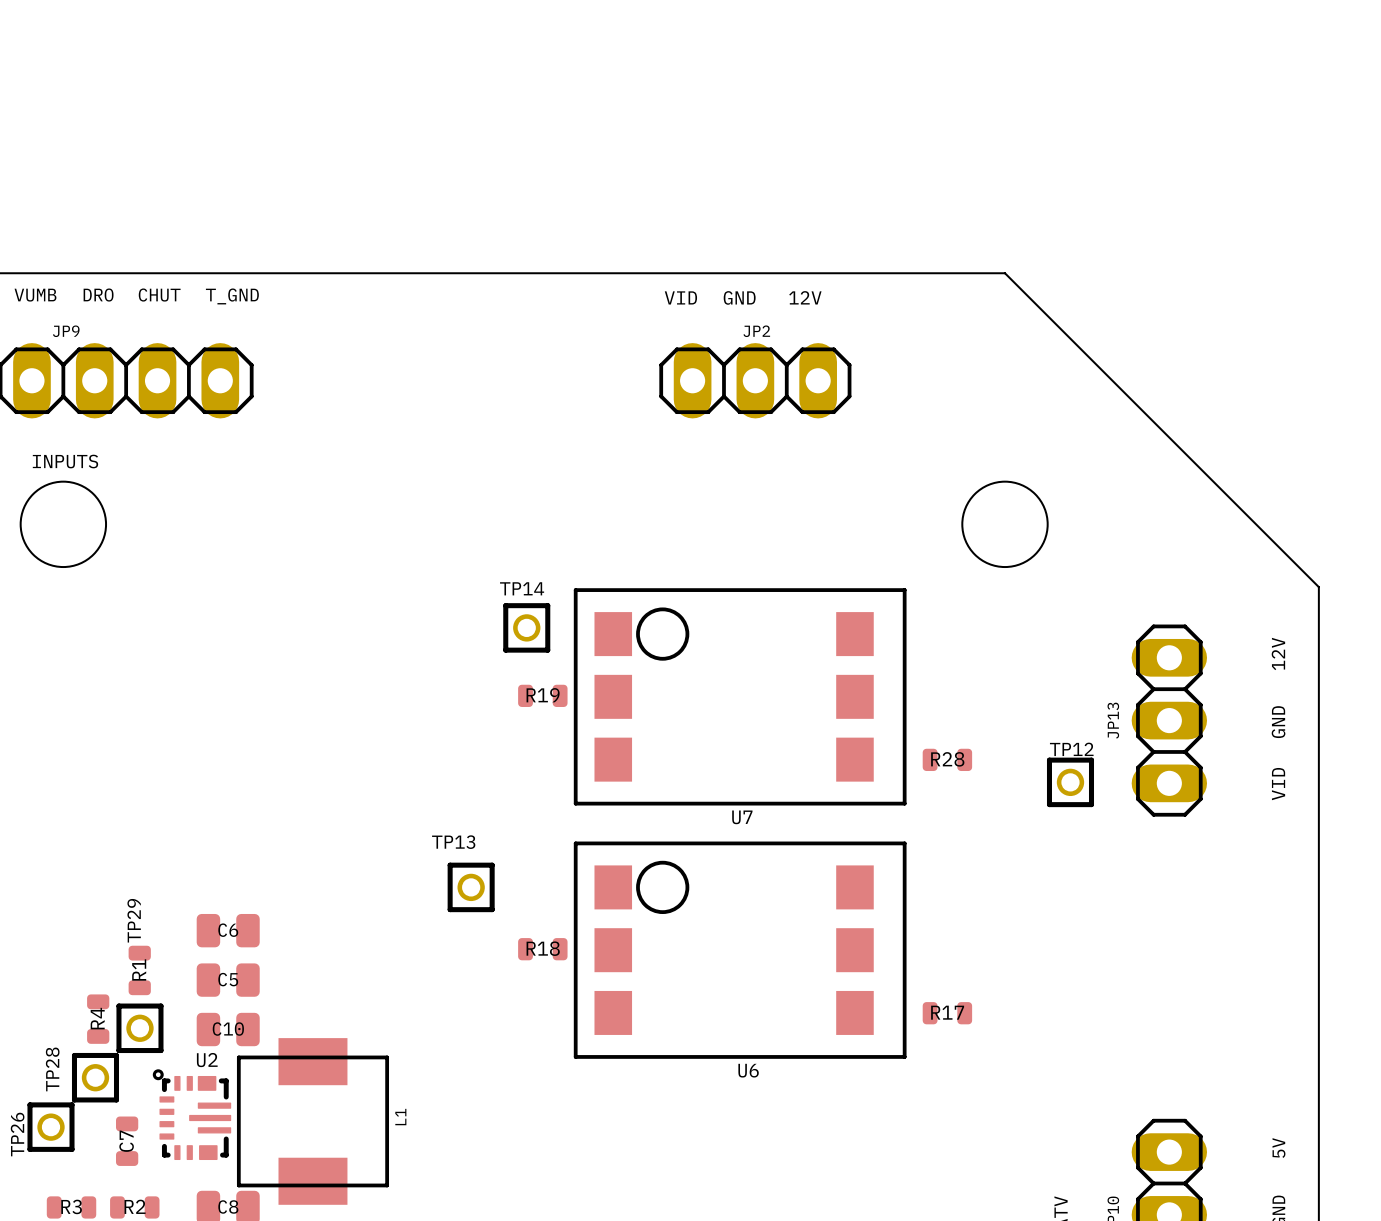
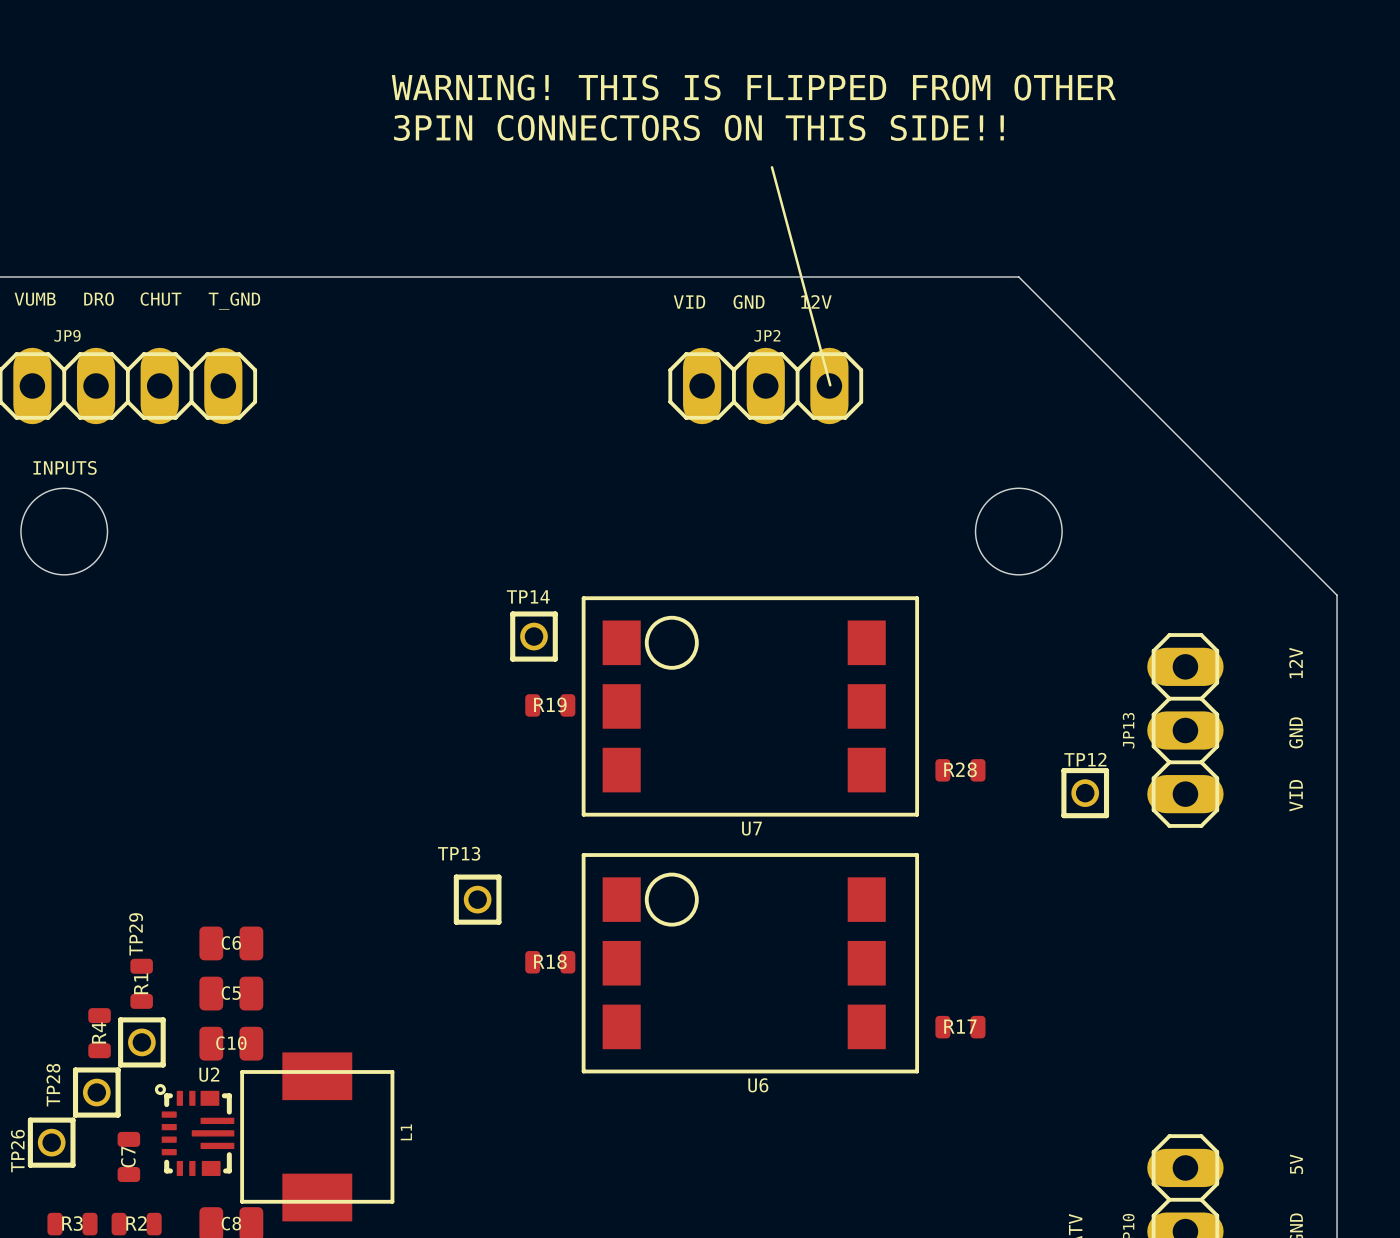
text: none -> WARNING! THIS IS FLIPPED FROM OTHER (753, 87)
text: none -> 3PIN CONNECTORS ON THIS SIDE!! (698, 127)
line: none -> (772, 167) (830, 385)

